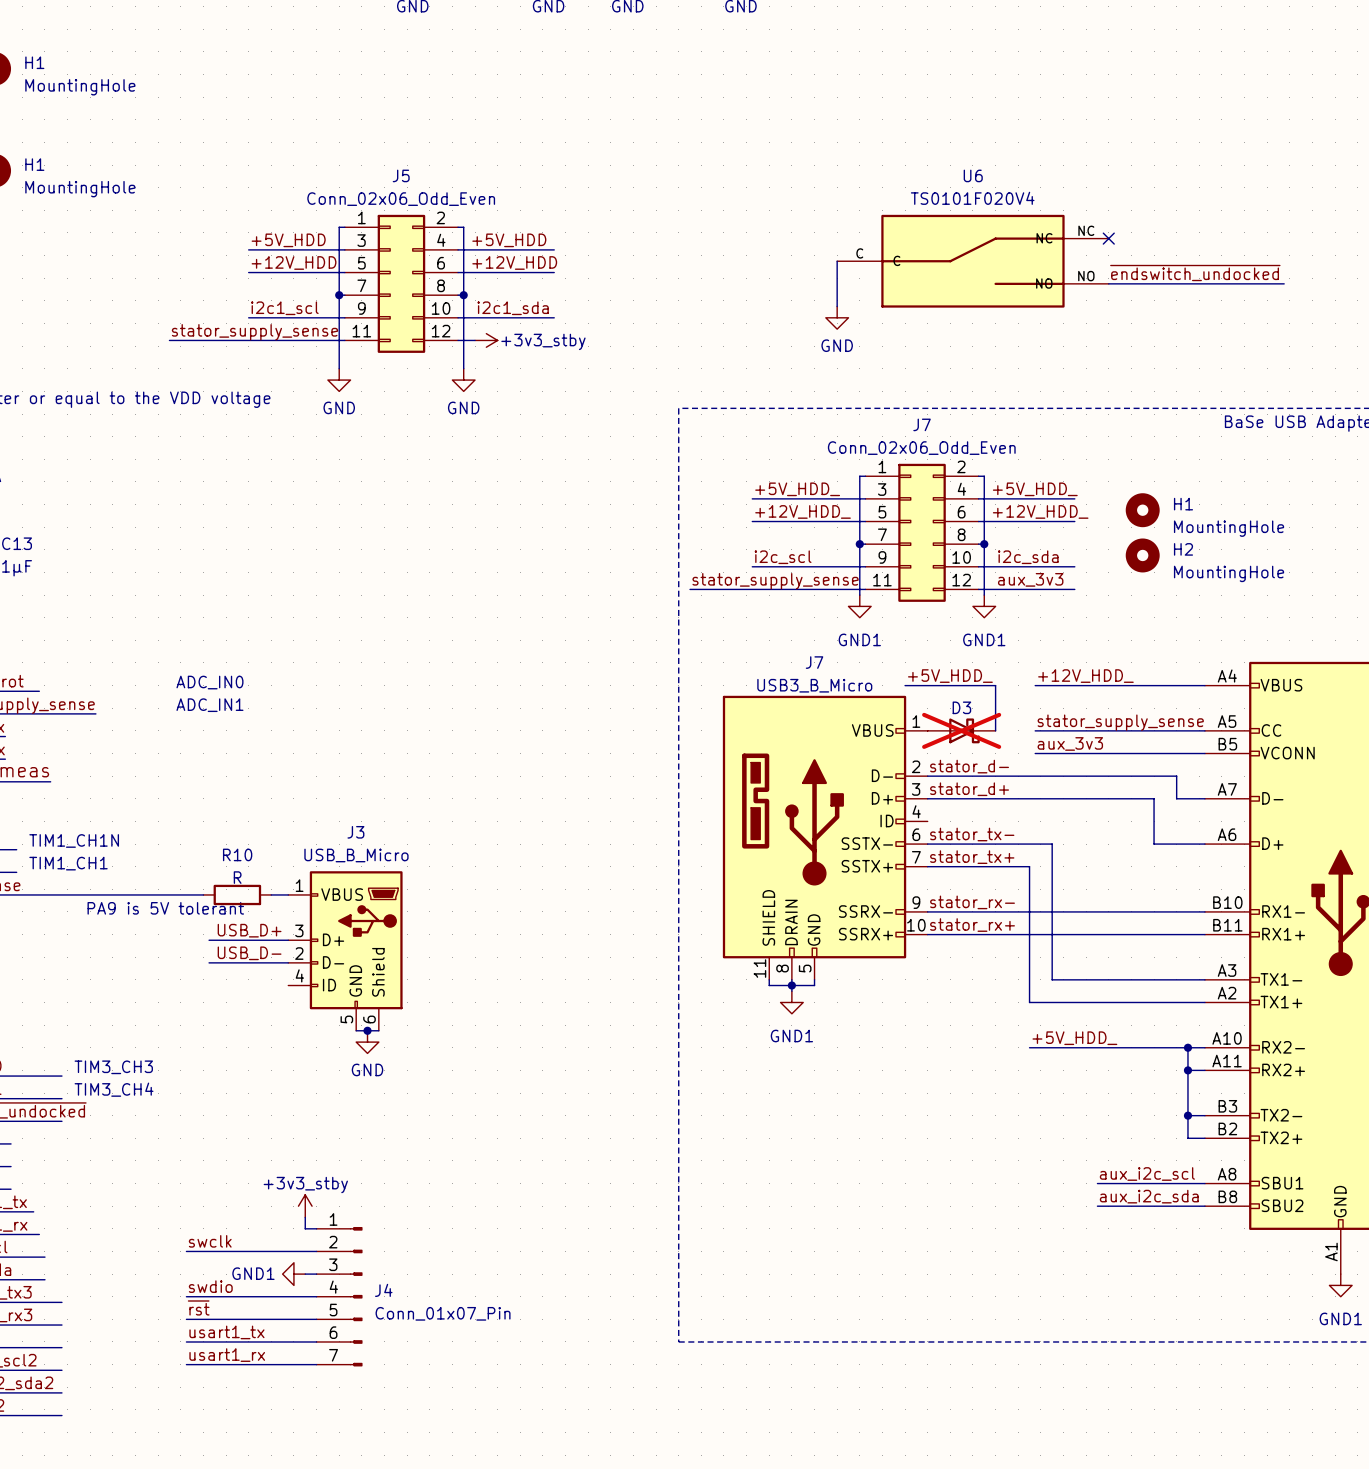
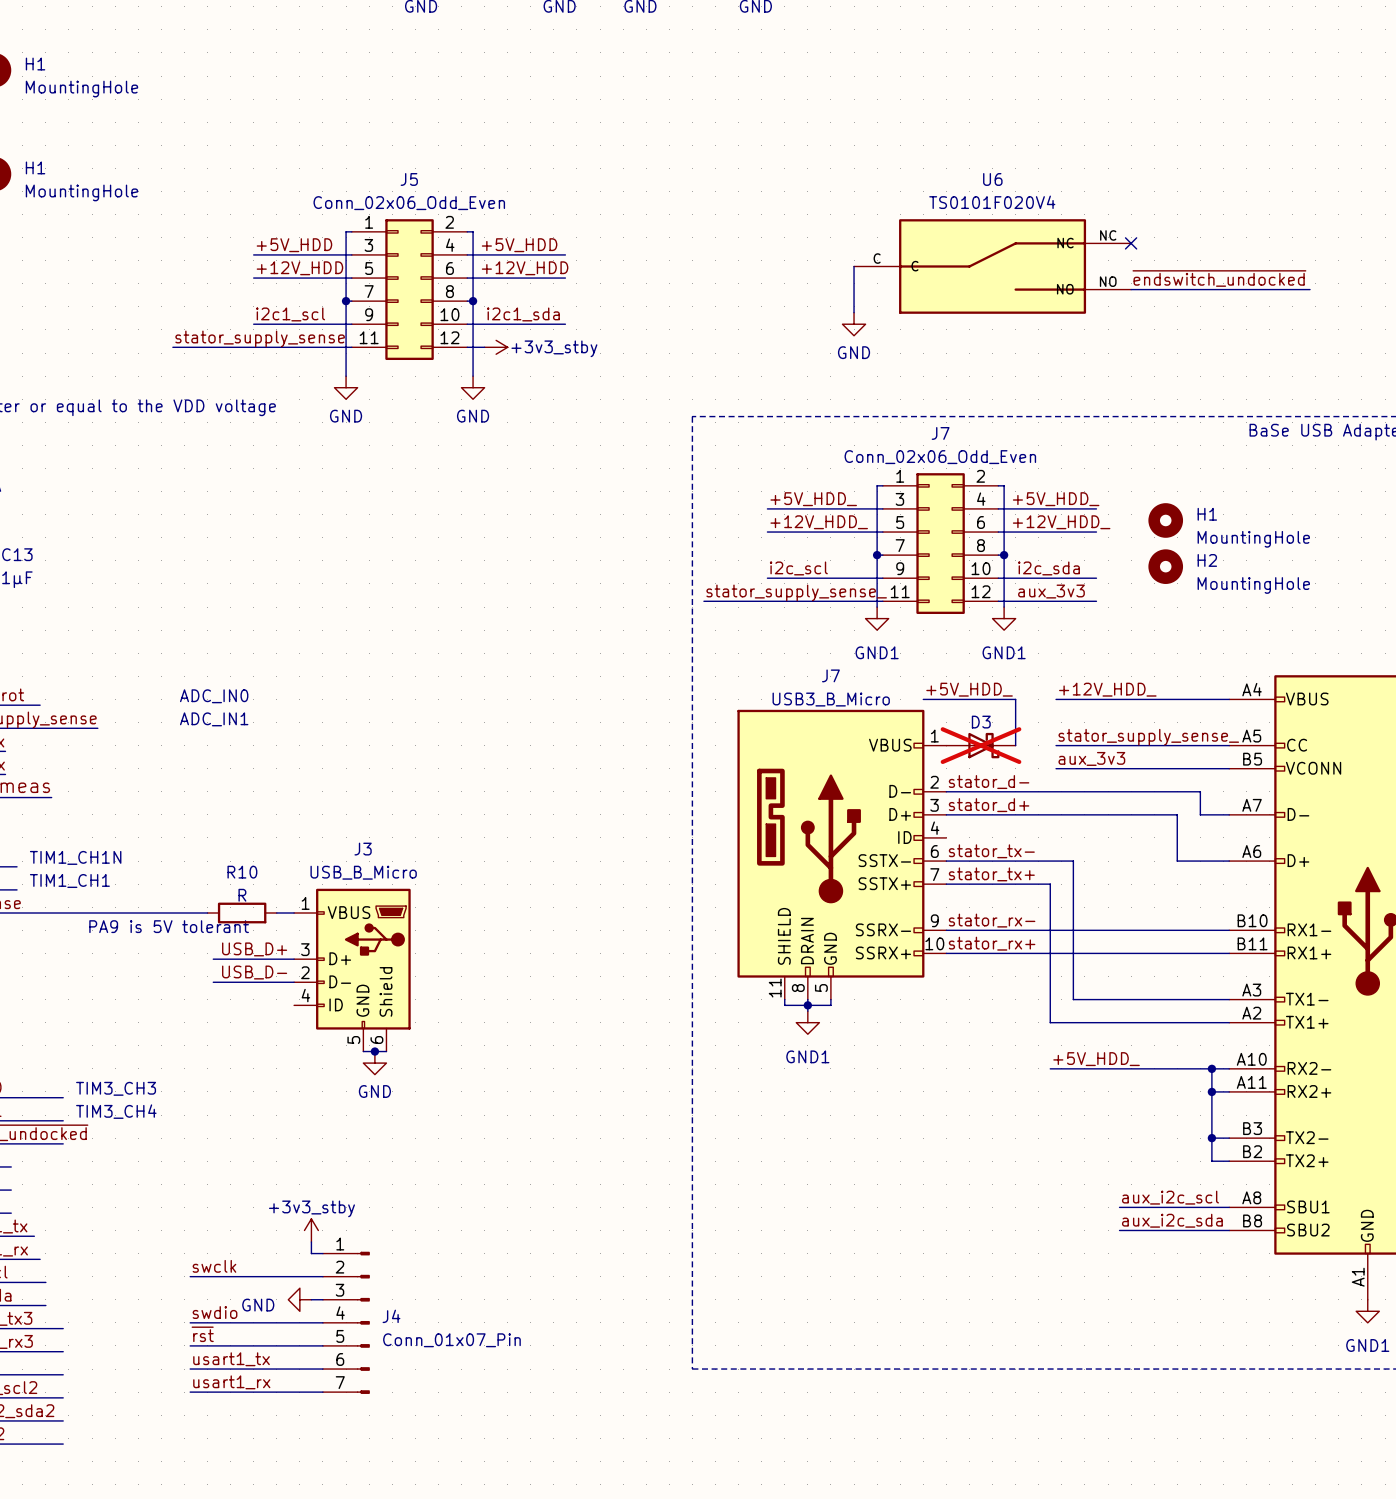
label: stator_supply_sense (775, 581) -> stator_supply_sense_ (796, 592)
label: stator_supply_sense (1120, 722) -> stator_supply_sense_ (1148, 737)
power symbol: GND1 (293, 1274) -> GND (299, 1299)

